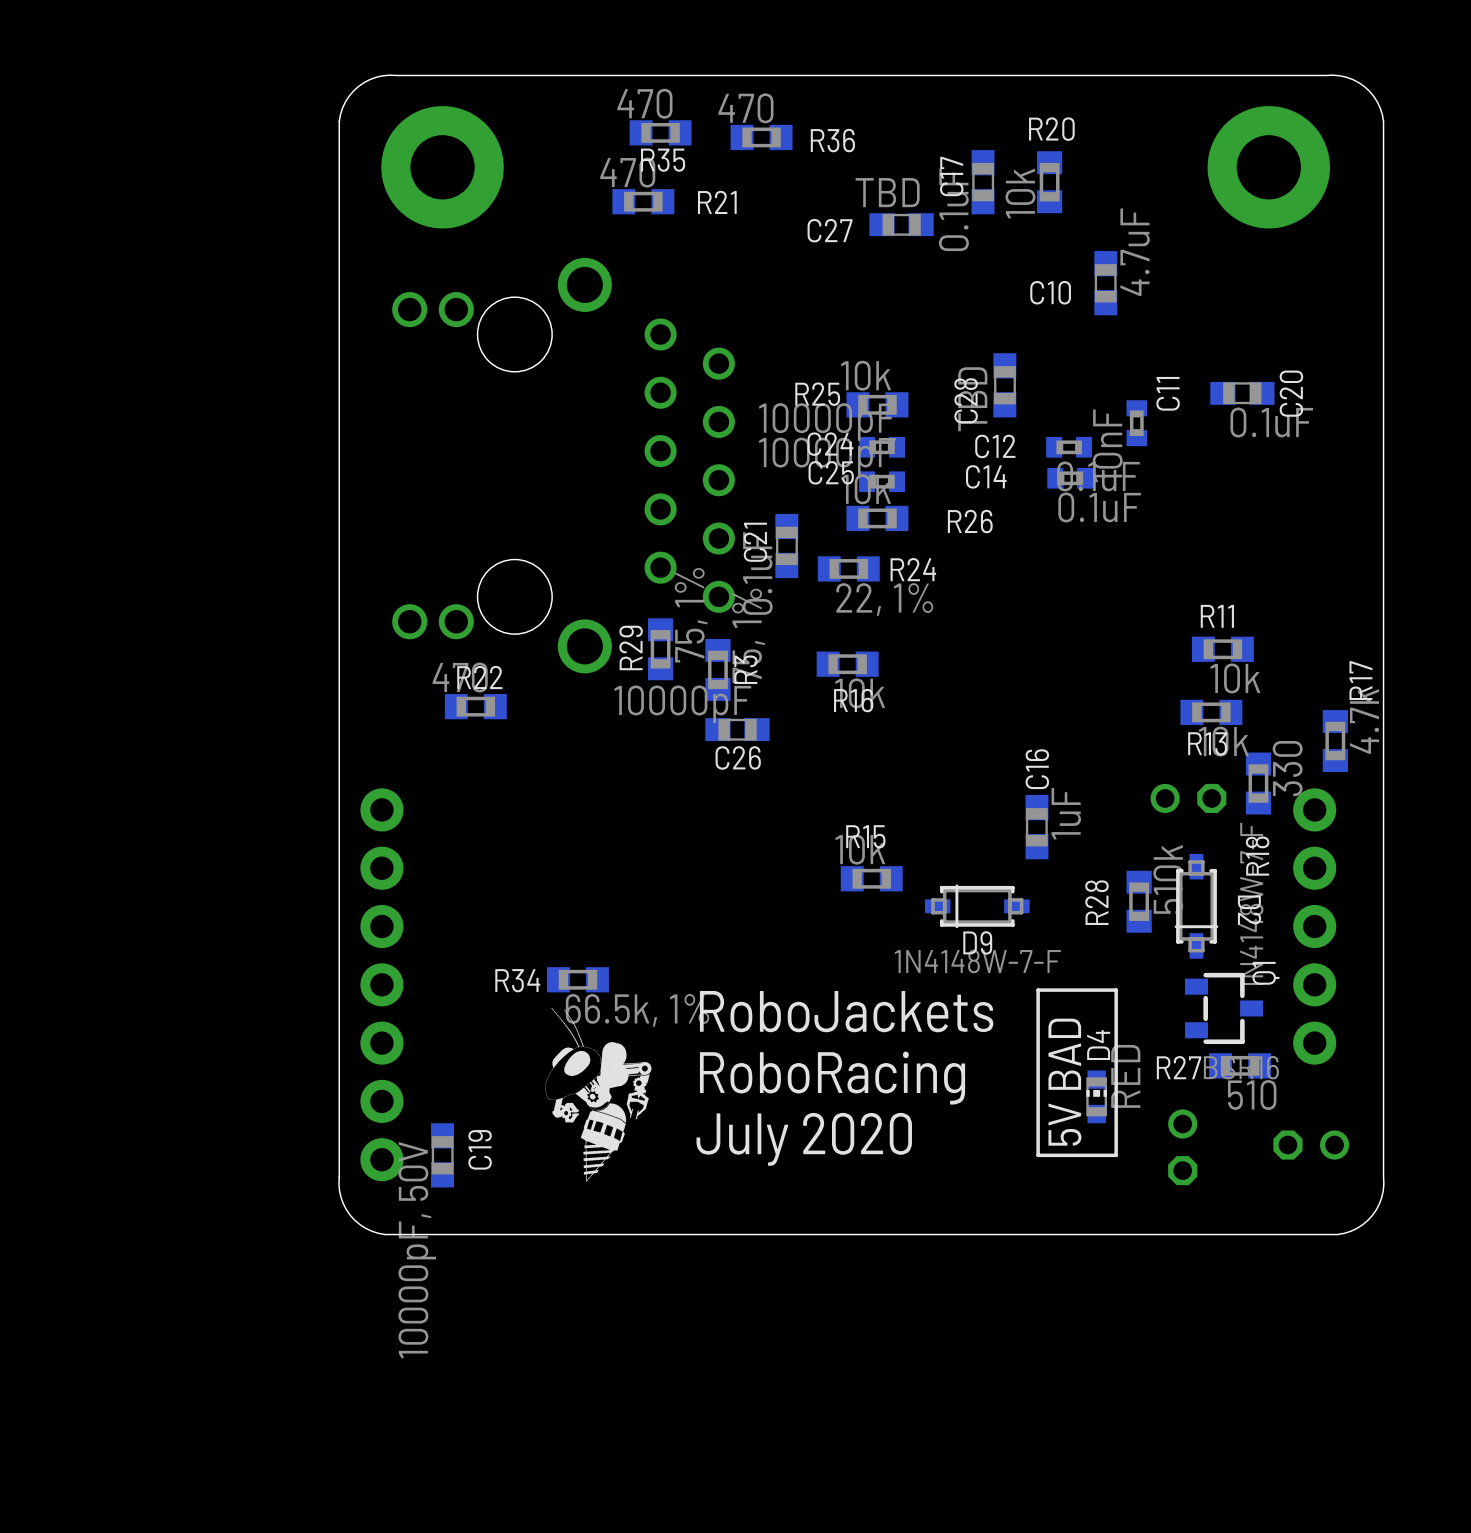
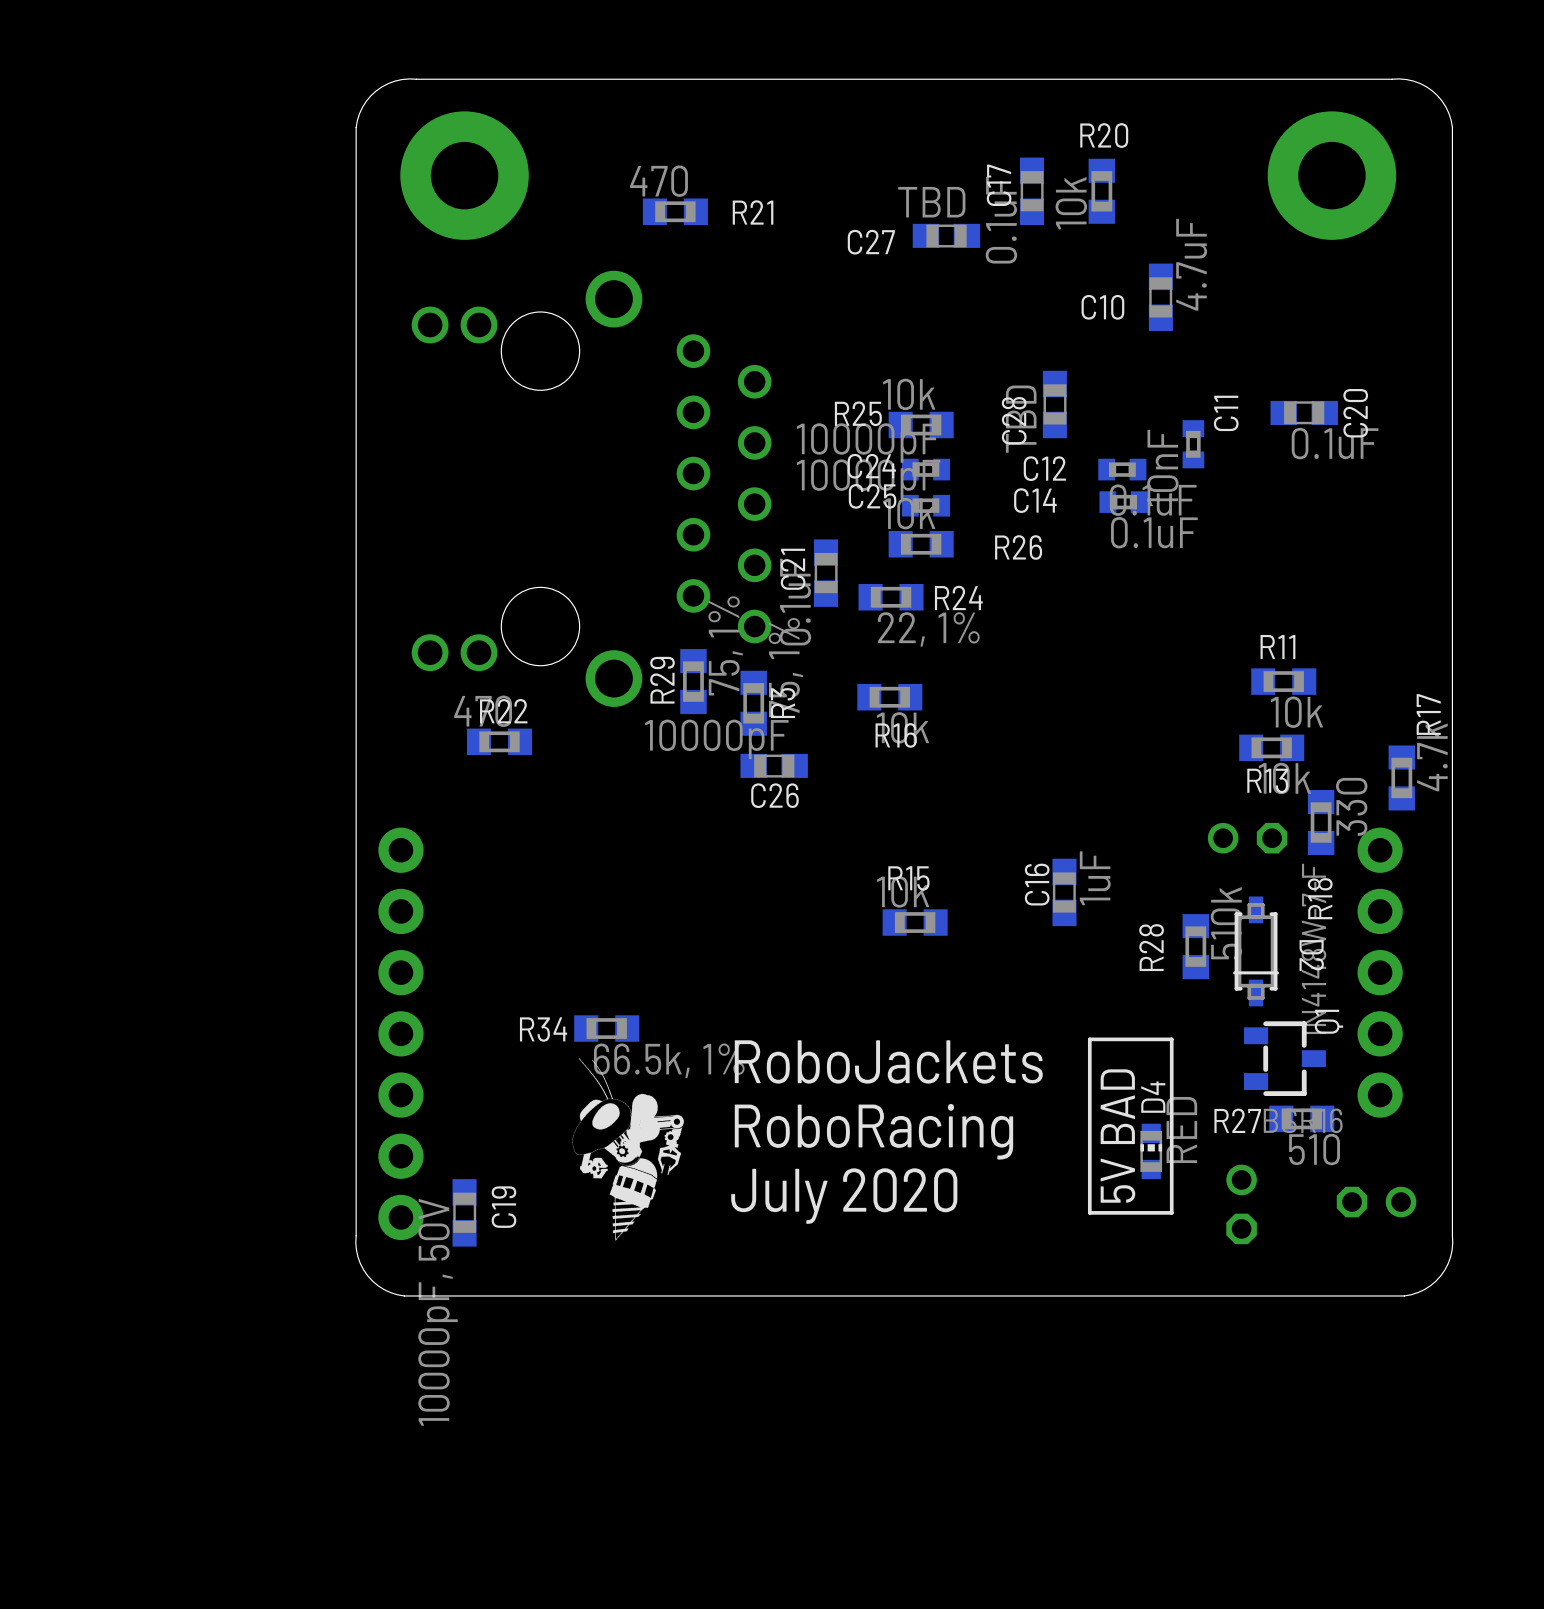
R35: 470 (660, 132) -> none
R36: 470 (761, 137) -> none
C16 name position: C16 (1037, 769) -> C16 (1037, 884)
C16 position: (1036, 827) -> (1064, 892)
D9: 1N4148W-7-F (977, 906) -> none

